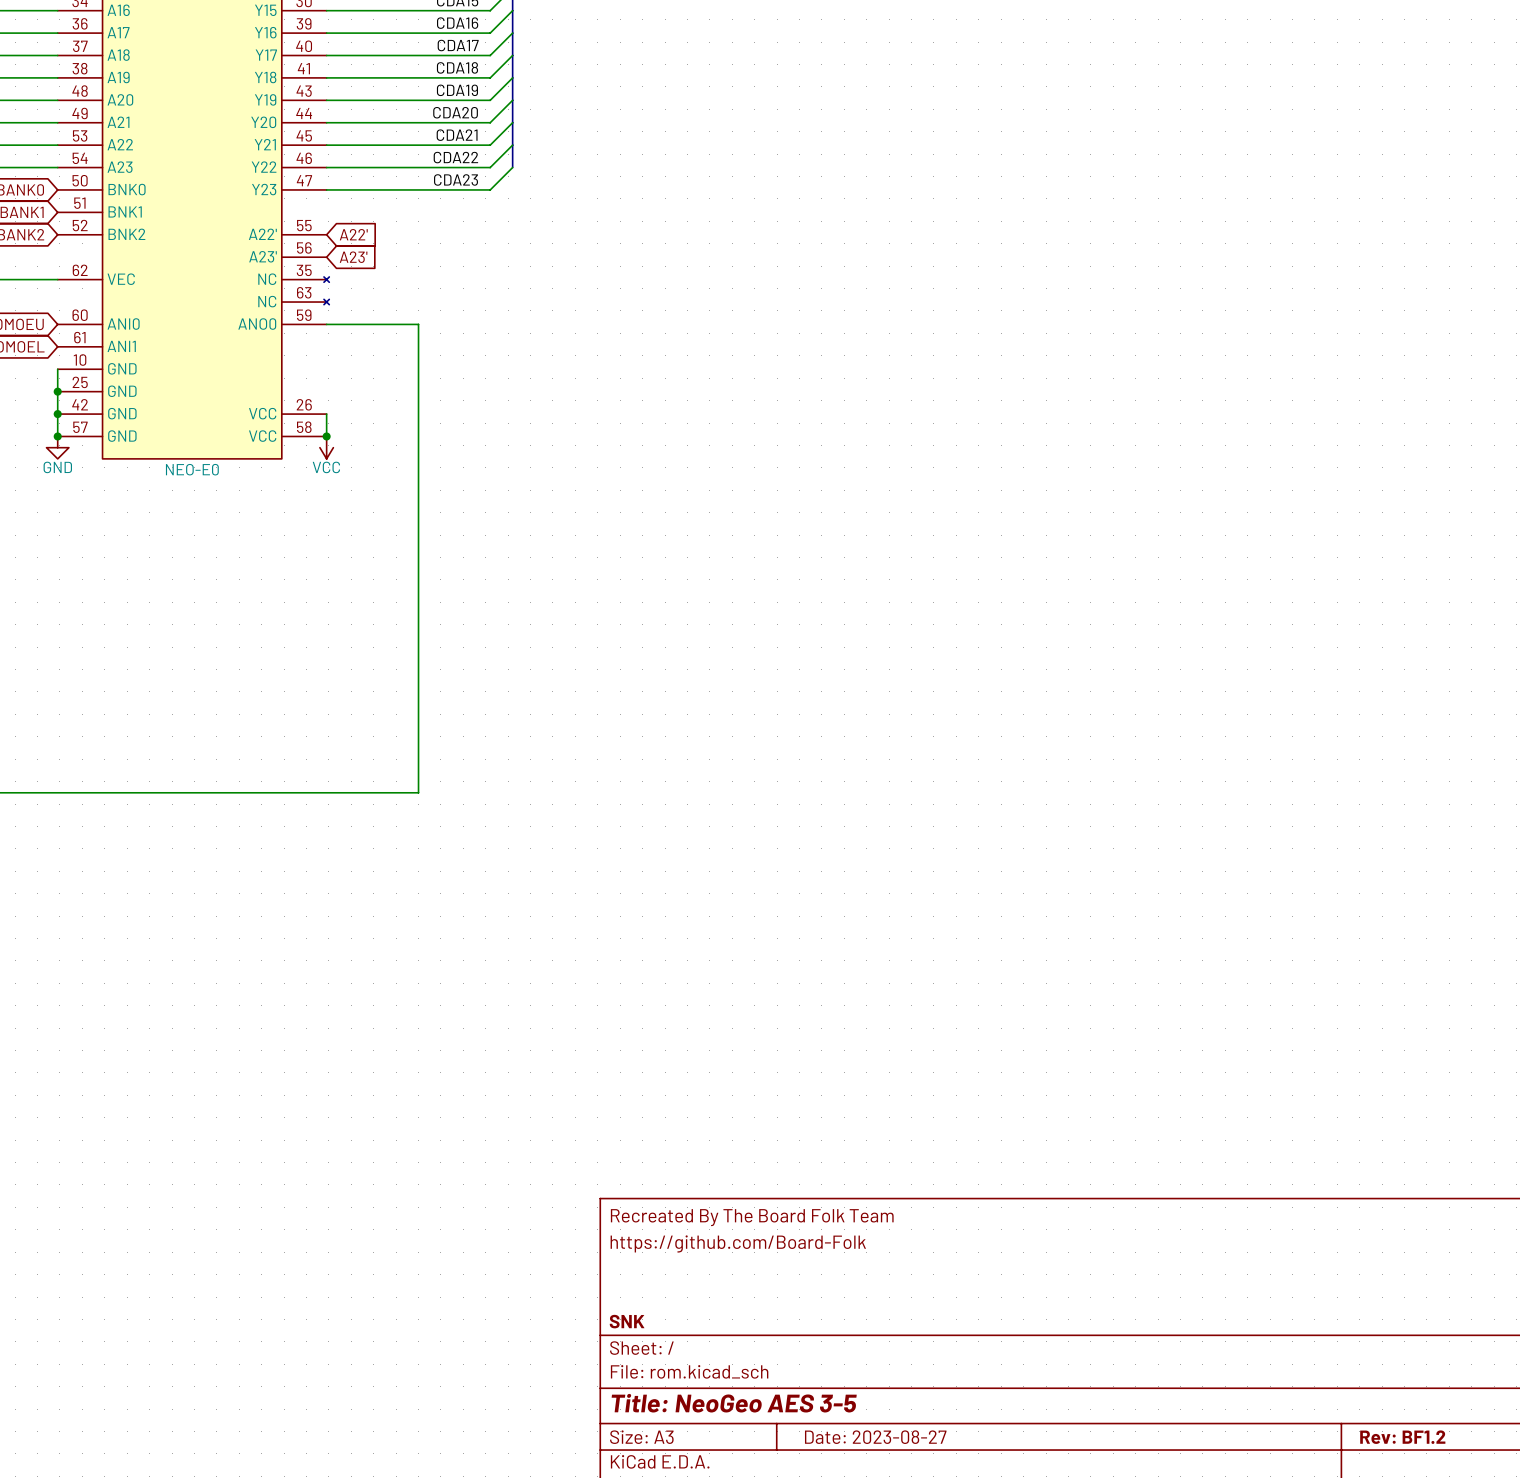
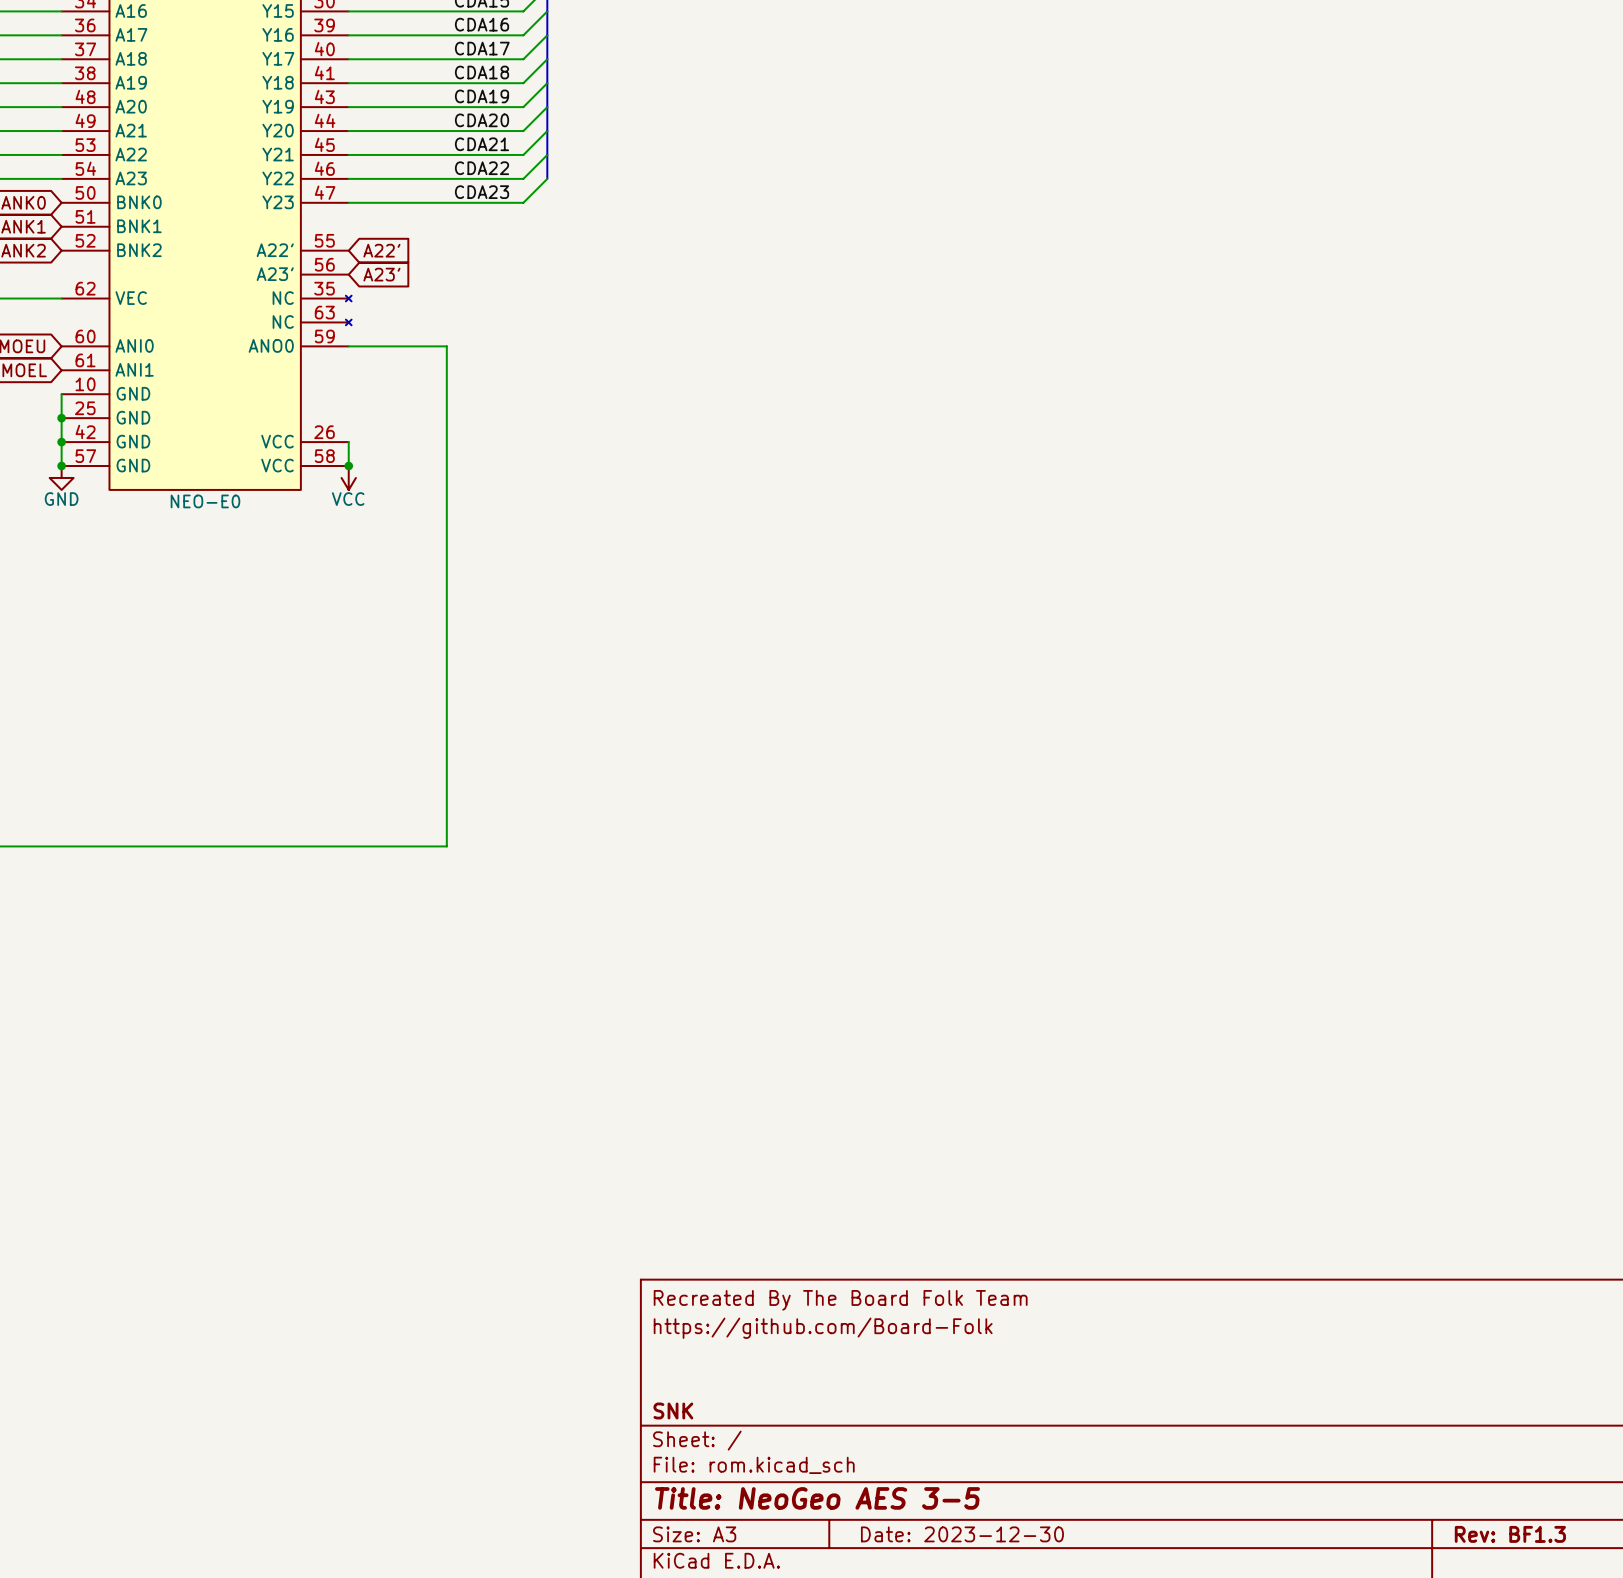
title block: Date: 2023-08-27 (875, 1437) -> Date: 2023-12-30 (962, 1534)
title block: Rev: BF1.2 (1402, 1437) -> Rev: BF1.3 (1510, 1534)

